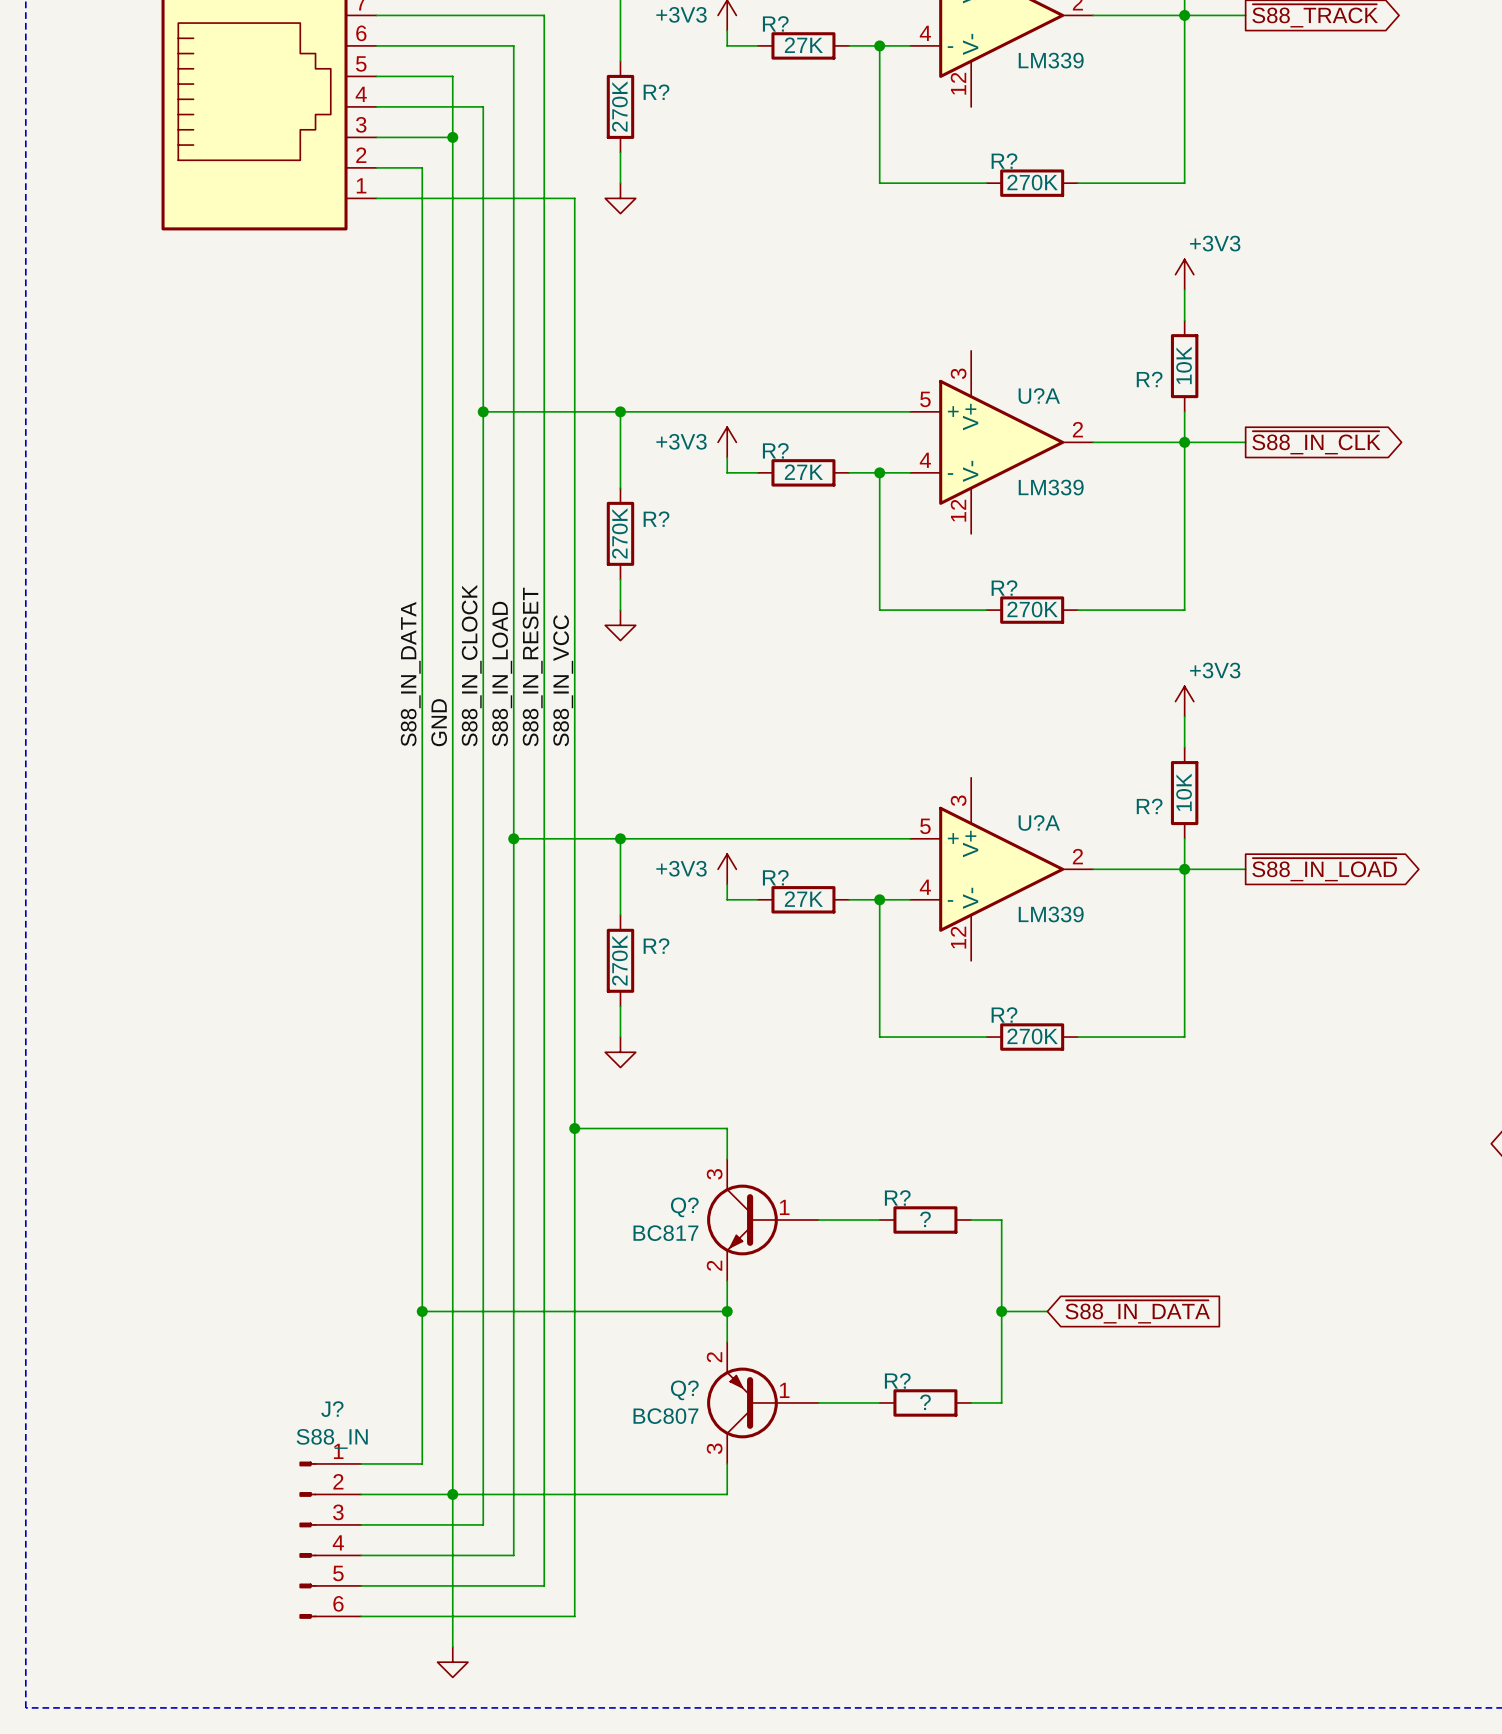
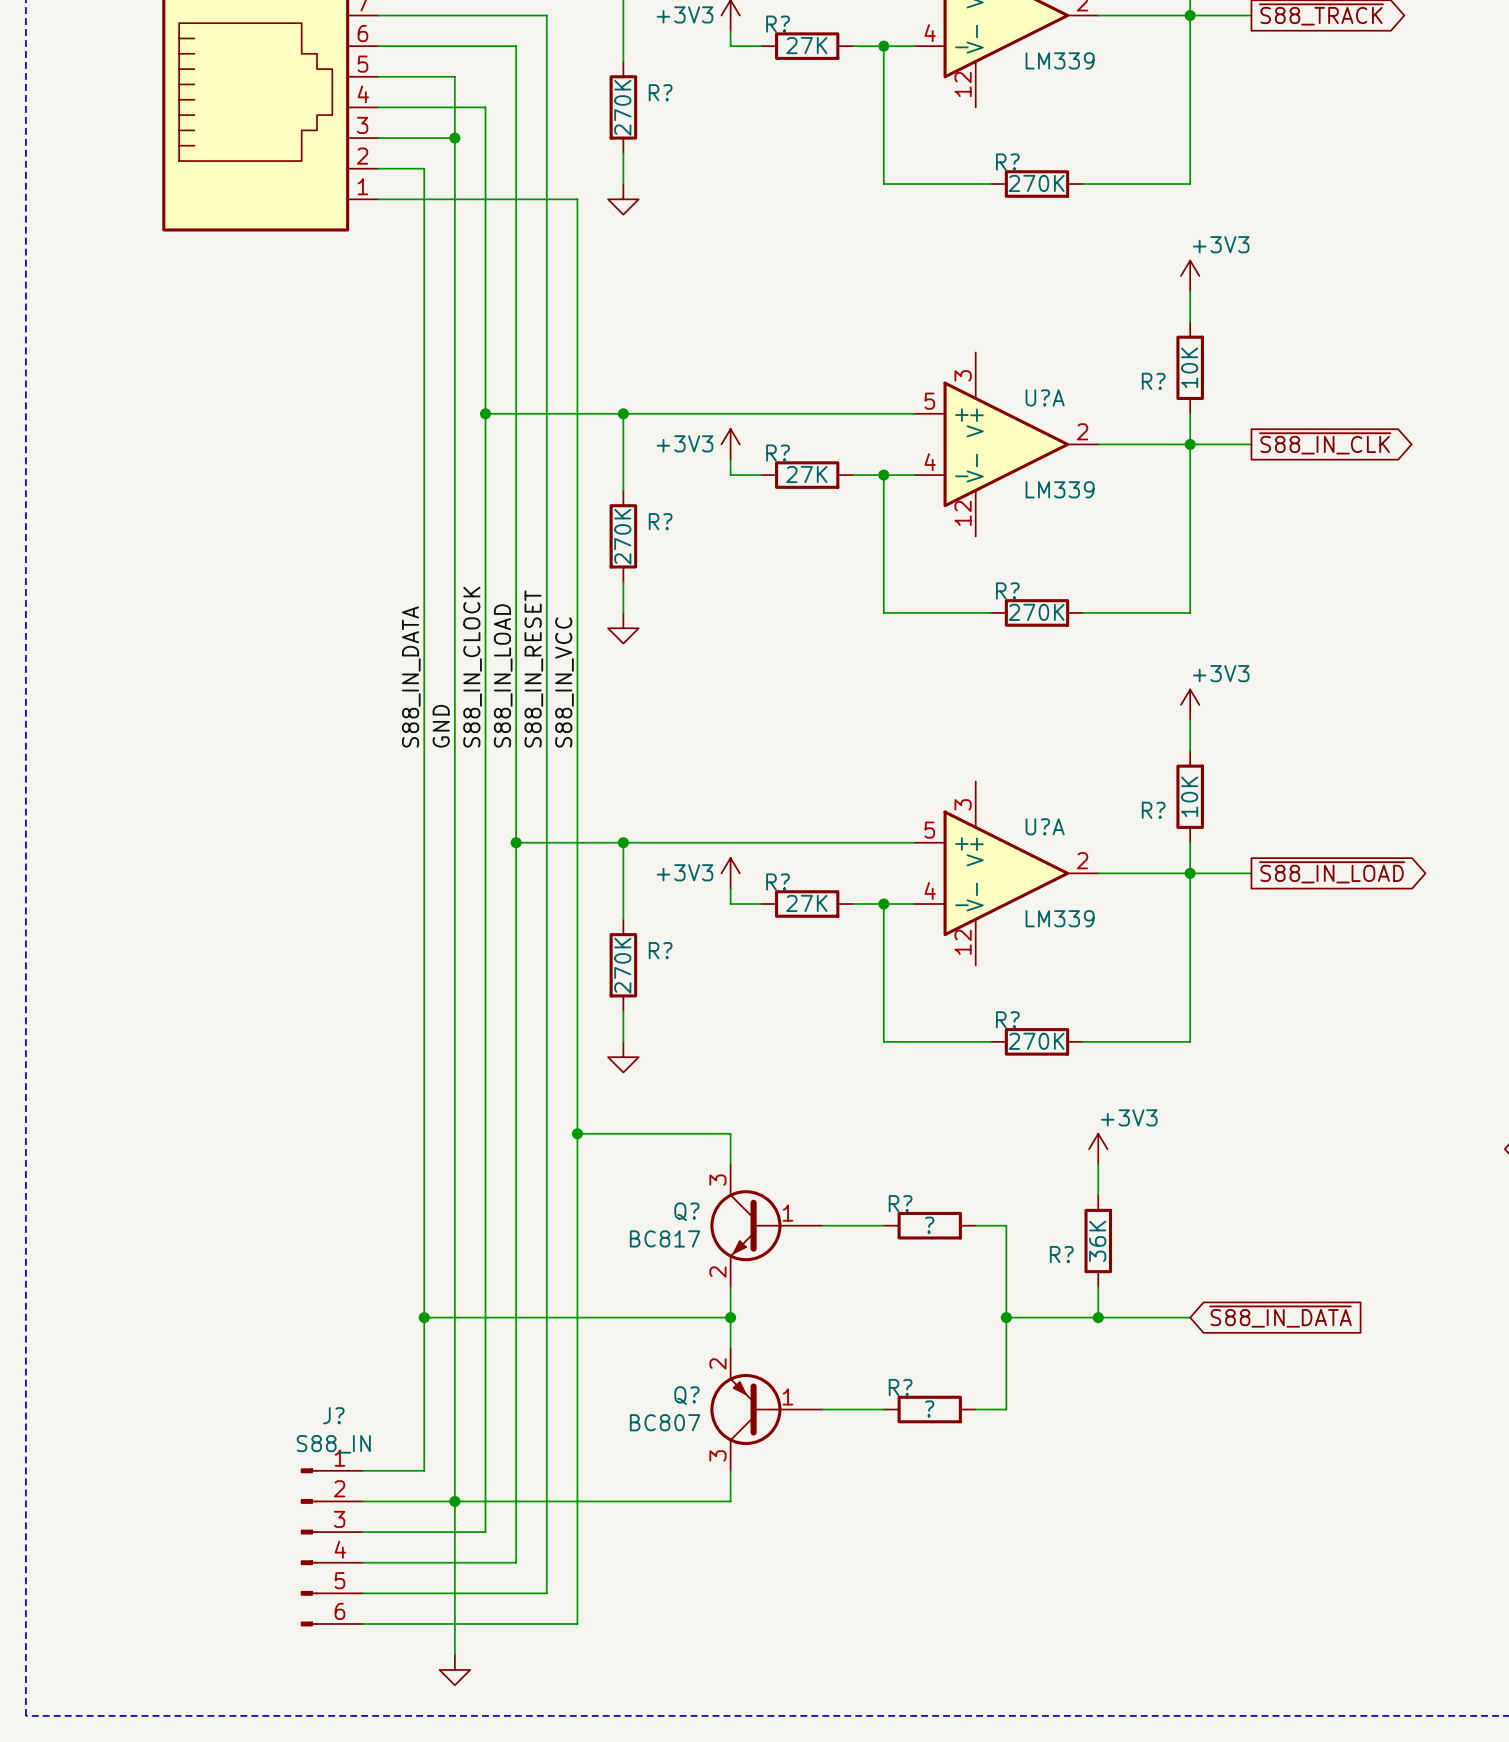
power symbol: none -> +3V3 (1098, 1149)
wire: none -> (1098, 1164) (1098, 1195)
R?: none -> 36K (1098, 1241)
wire: none -> (1098, 1286) (1098, 1317)
wire: none -> (1052, 1317) (1190, 1317)
junction: none -> (1098, 1317)
global label position: ~{S88_IN_DATA} (1137, 1311) -> ~{S88_IN_DATA} (1280, 1316)

